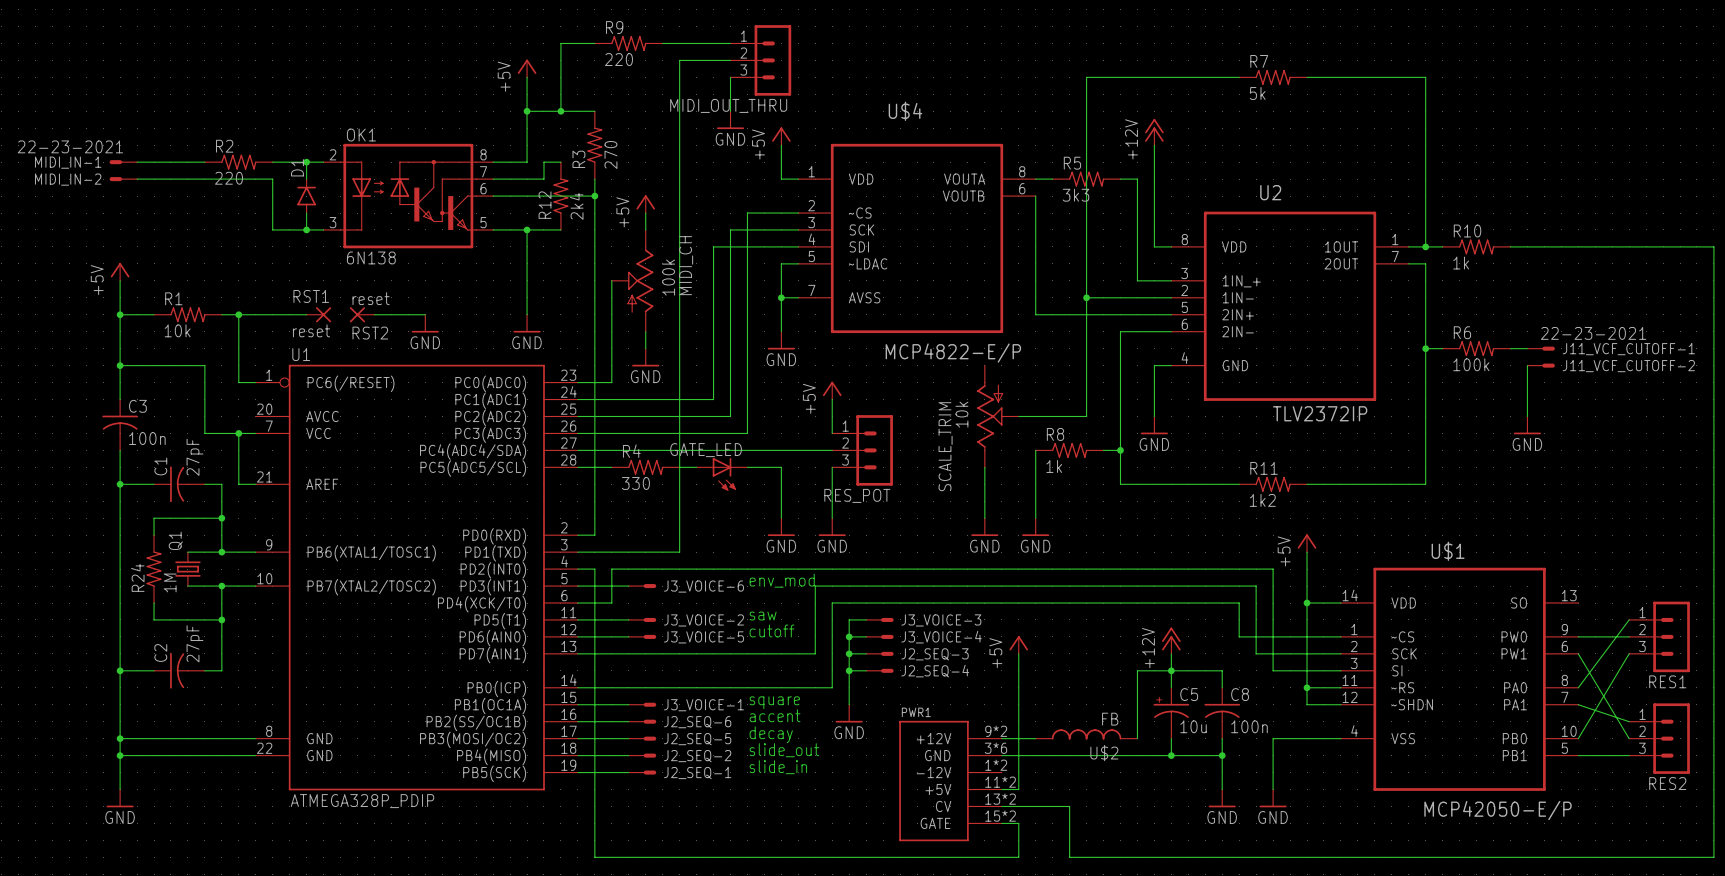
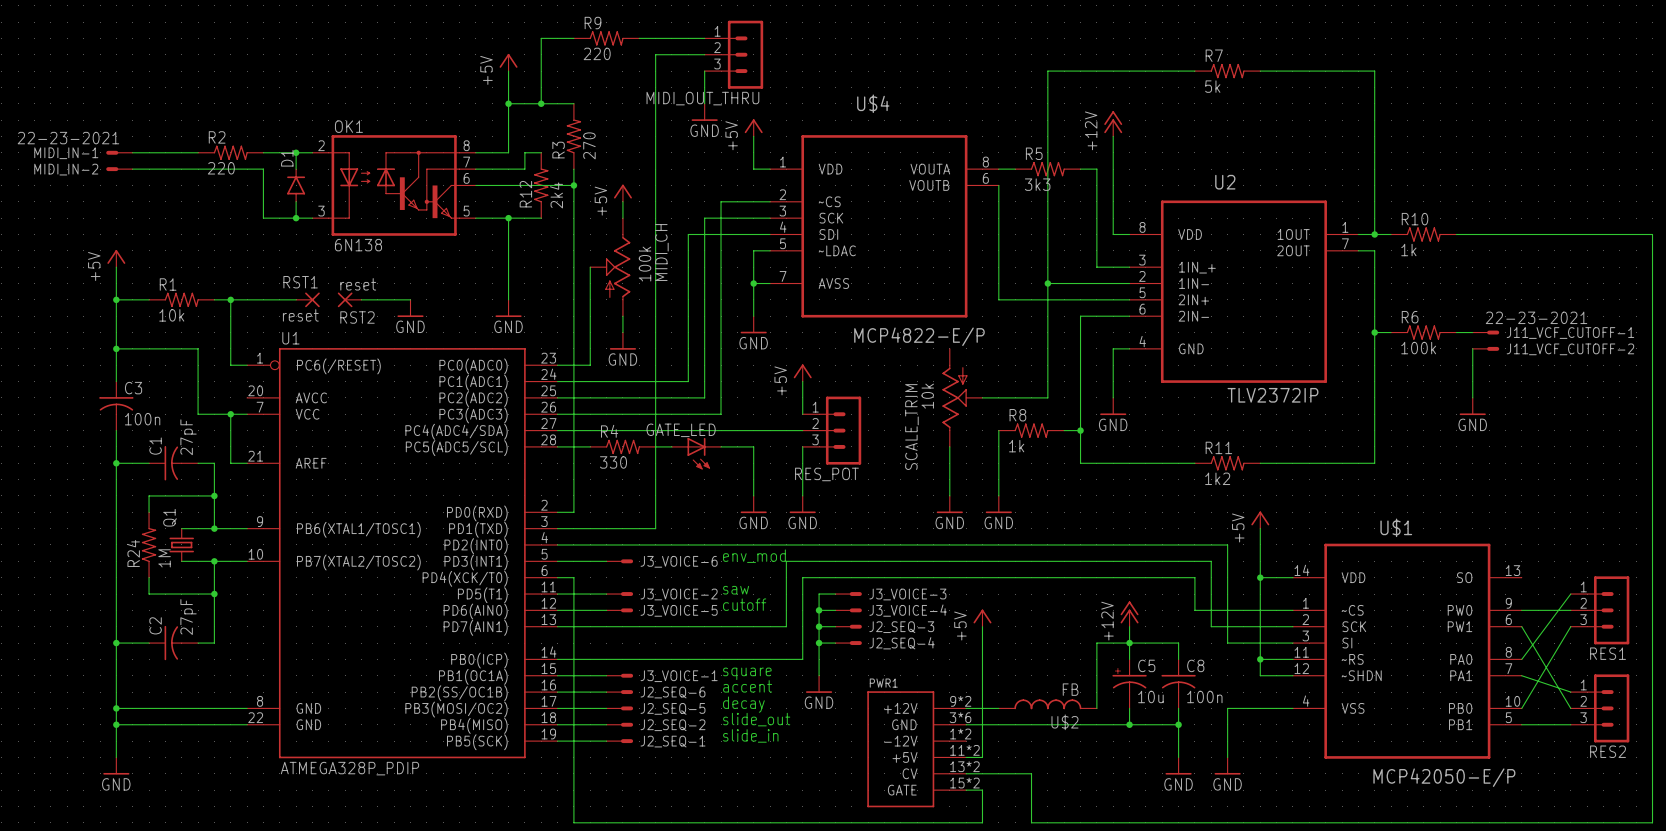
wire: (594, 569) (594, 603) (611, 603) (611, 569) -> (573, 544) (590, 544)

